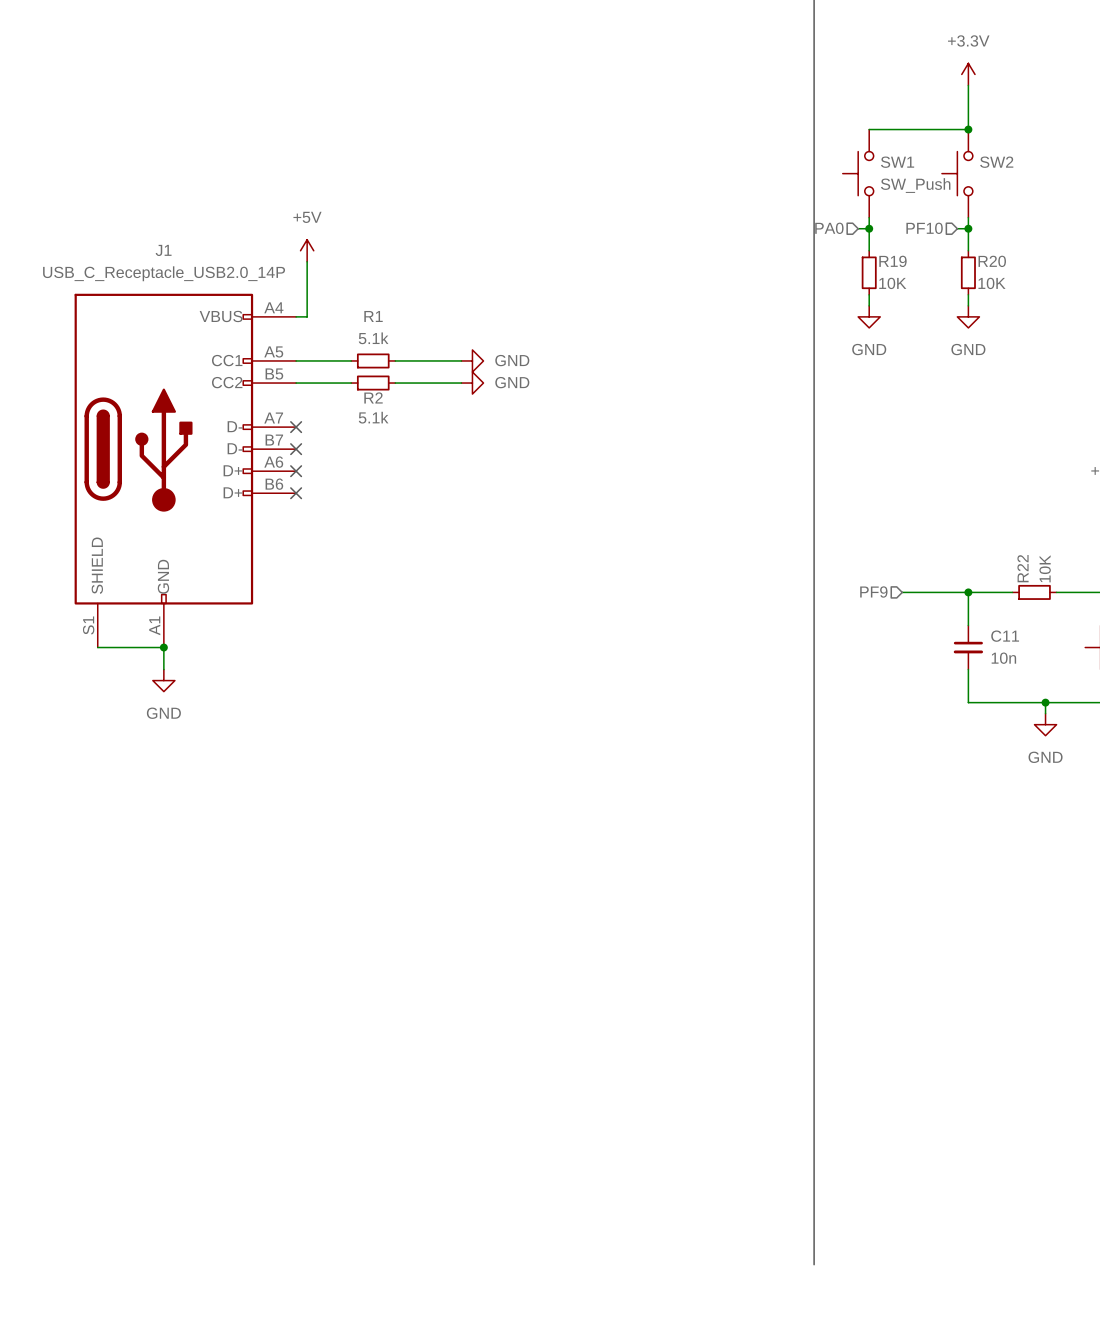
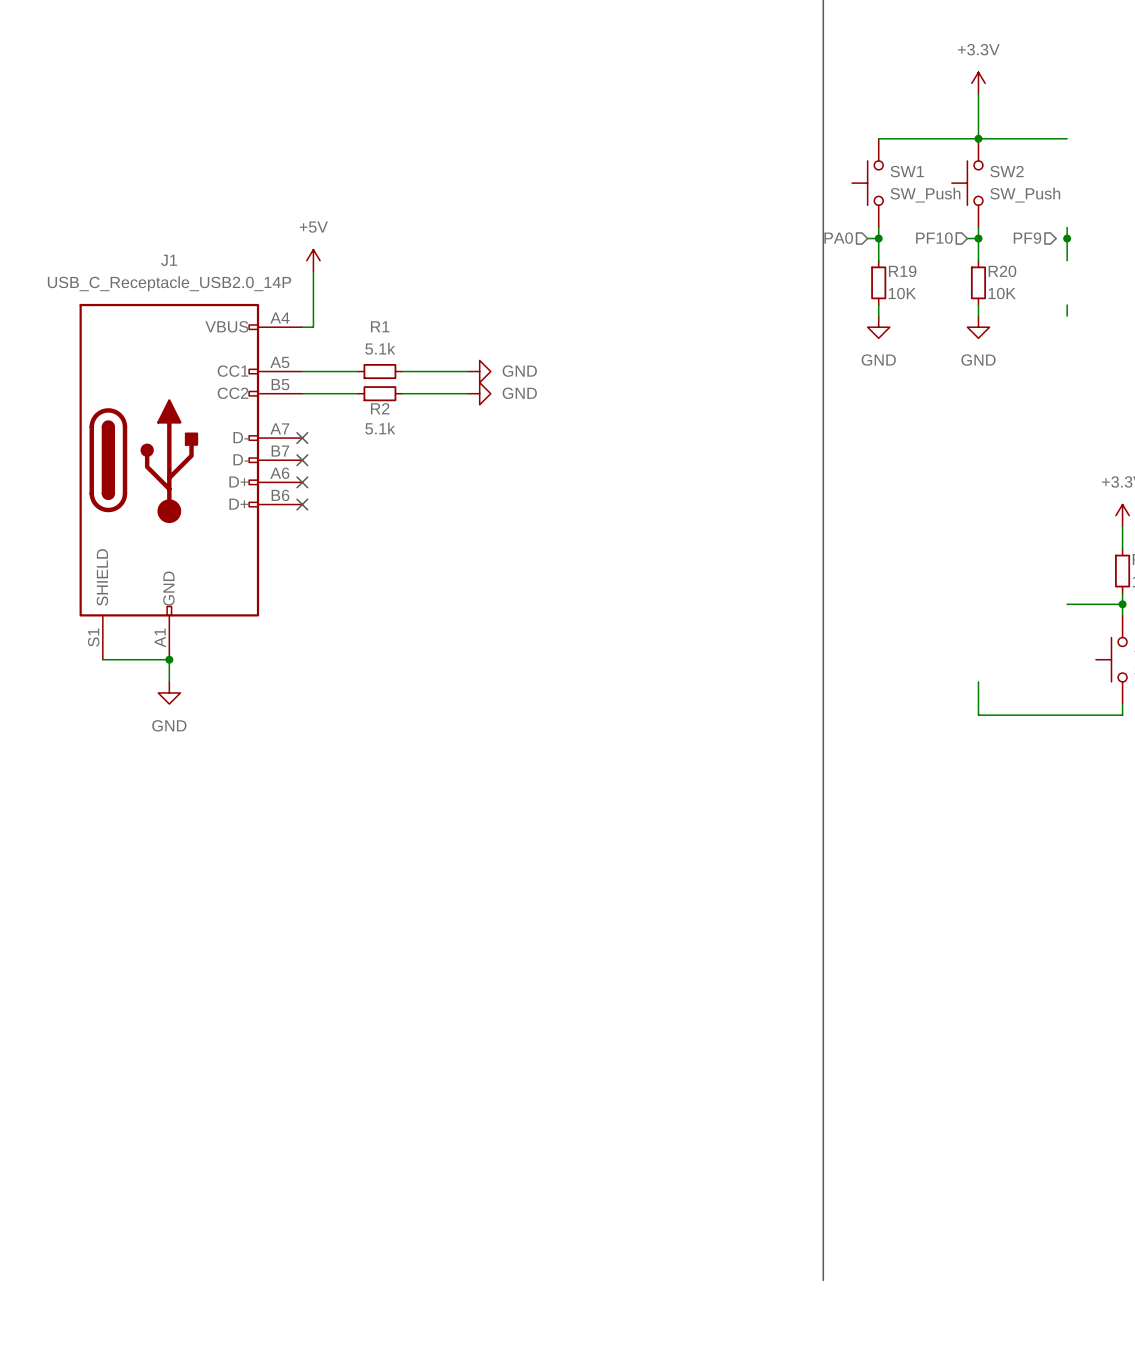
wire: none -> (978, 138) (1067, 138)
SW2 value: none -> SW_Push (1025, 195)
wire: none -> (1067, 227) (1067, 260)
hierarchical label: none -> PF9 (1027, 238)
junction: none -> (1067, 238)
wire: none -> (1067, 305) (1067, 316)
hierarchical label: PF9 (873, 592) -> none
wire: (902, 592) (1012, 592) -> none
wire: (968, 592) (968, 625) -> none
junction: (968, 592) -> none
R22: 10K (1034, 592) -> none
C11: 10n (968, 647) -> none
wire: (1045, 702) (1045, 713) -> none
junction: (1045, 702) -> none
power symbol: GND (1045, 724) -> none

